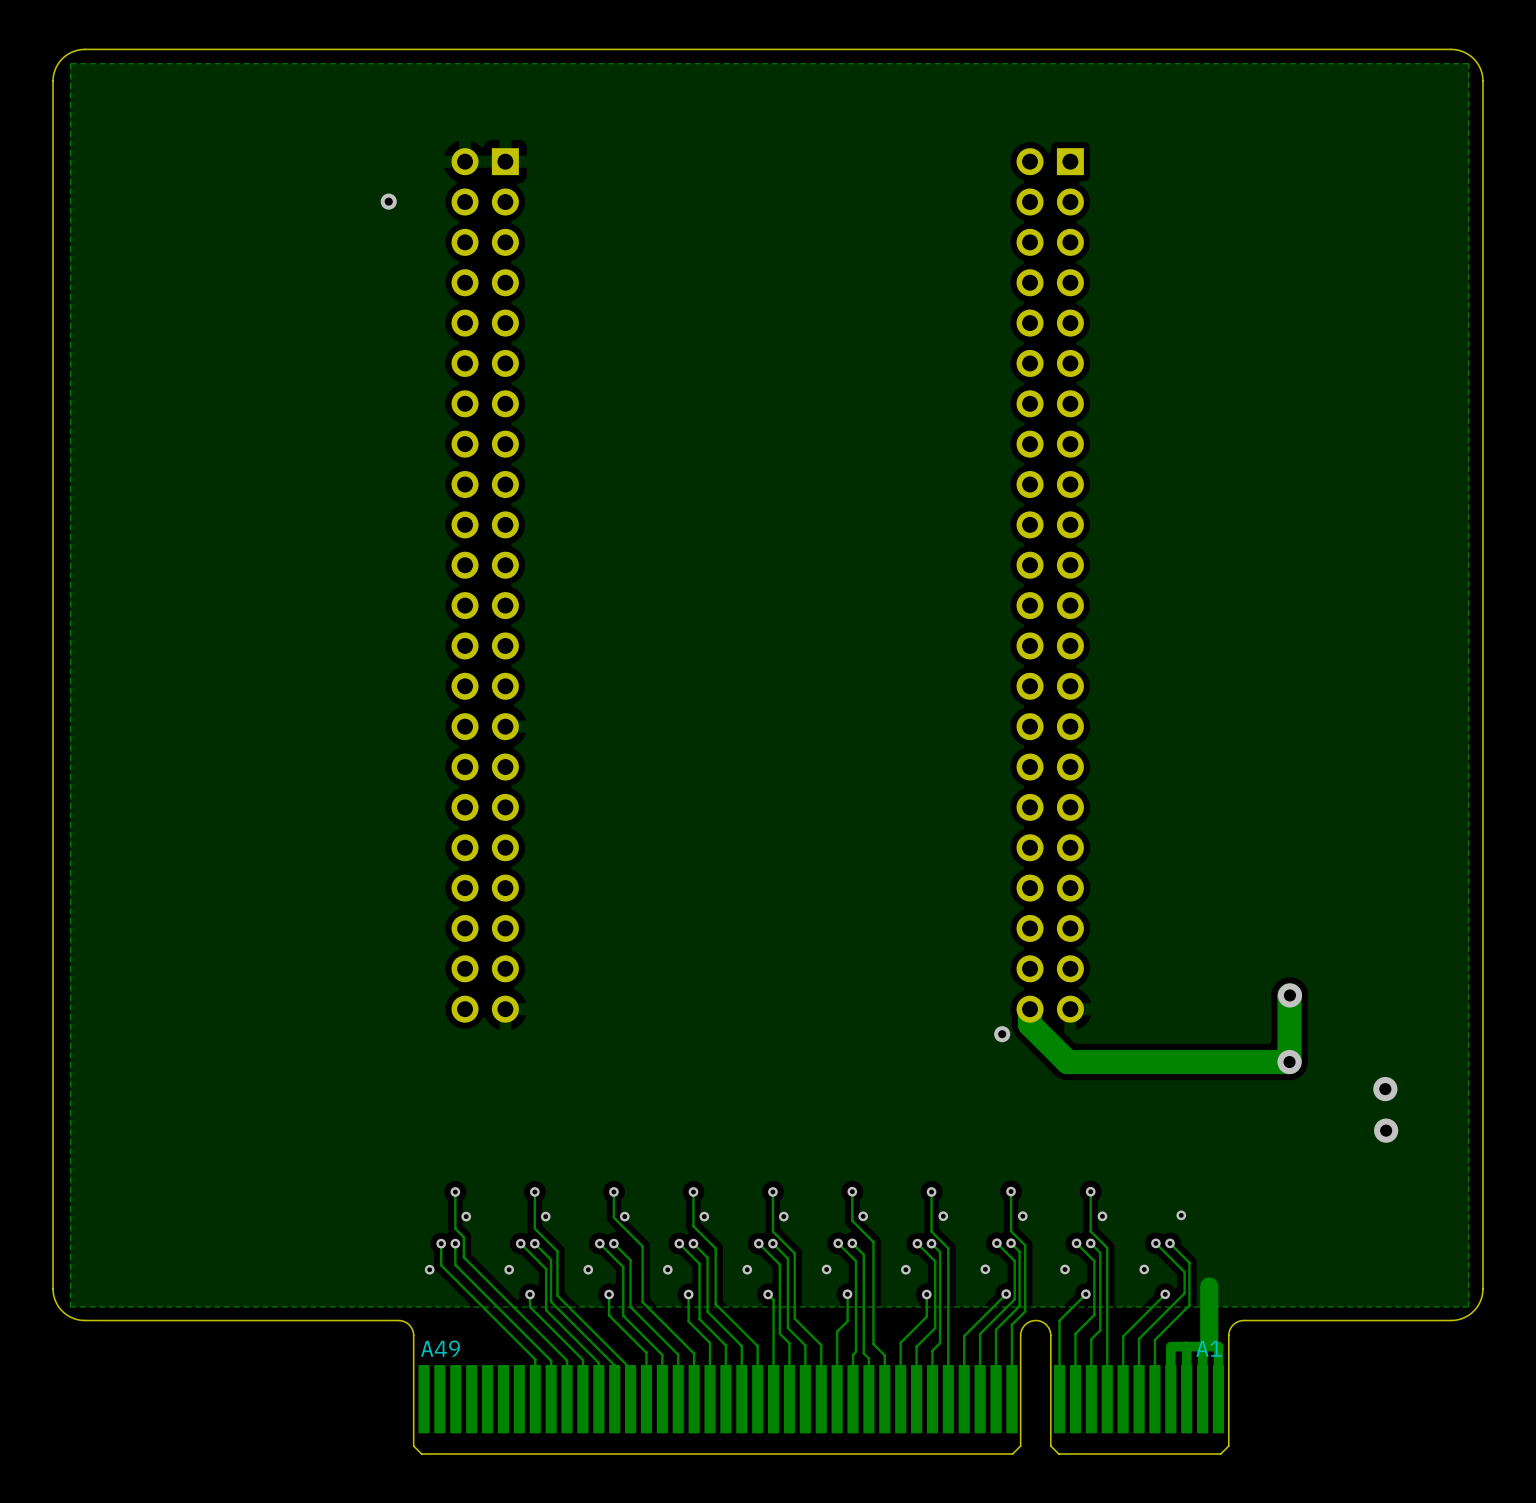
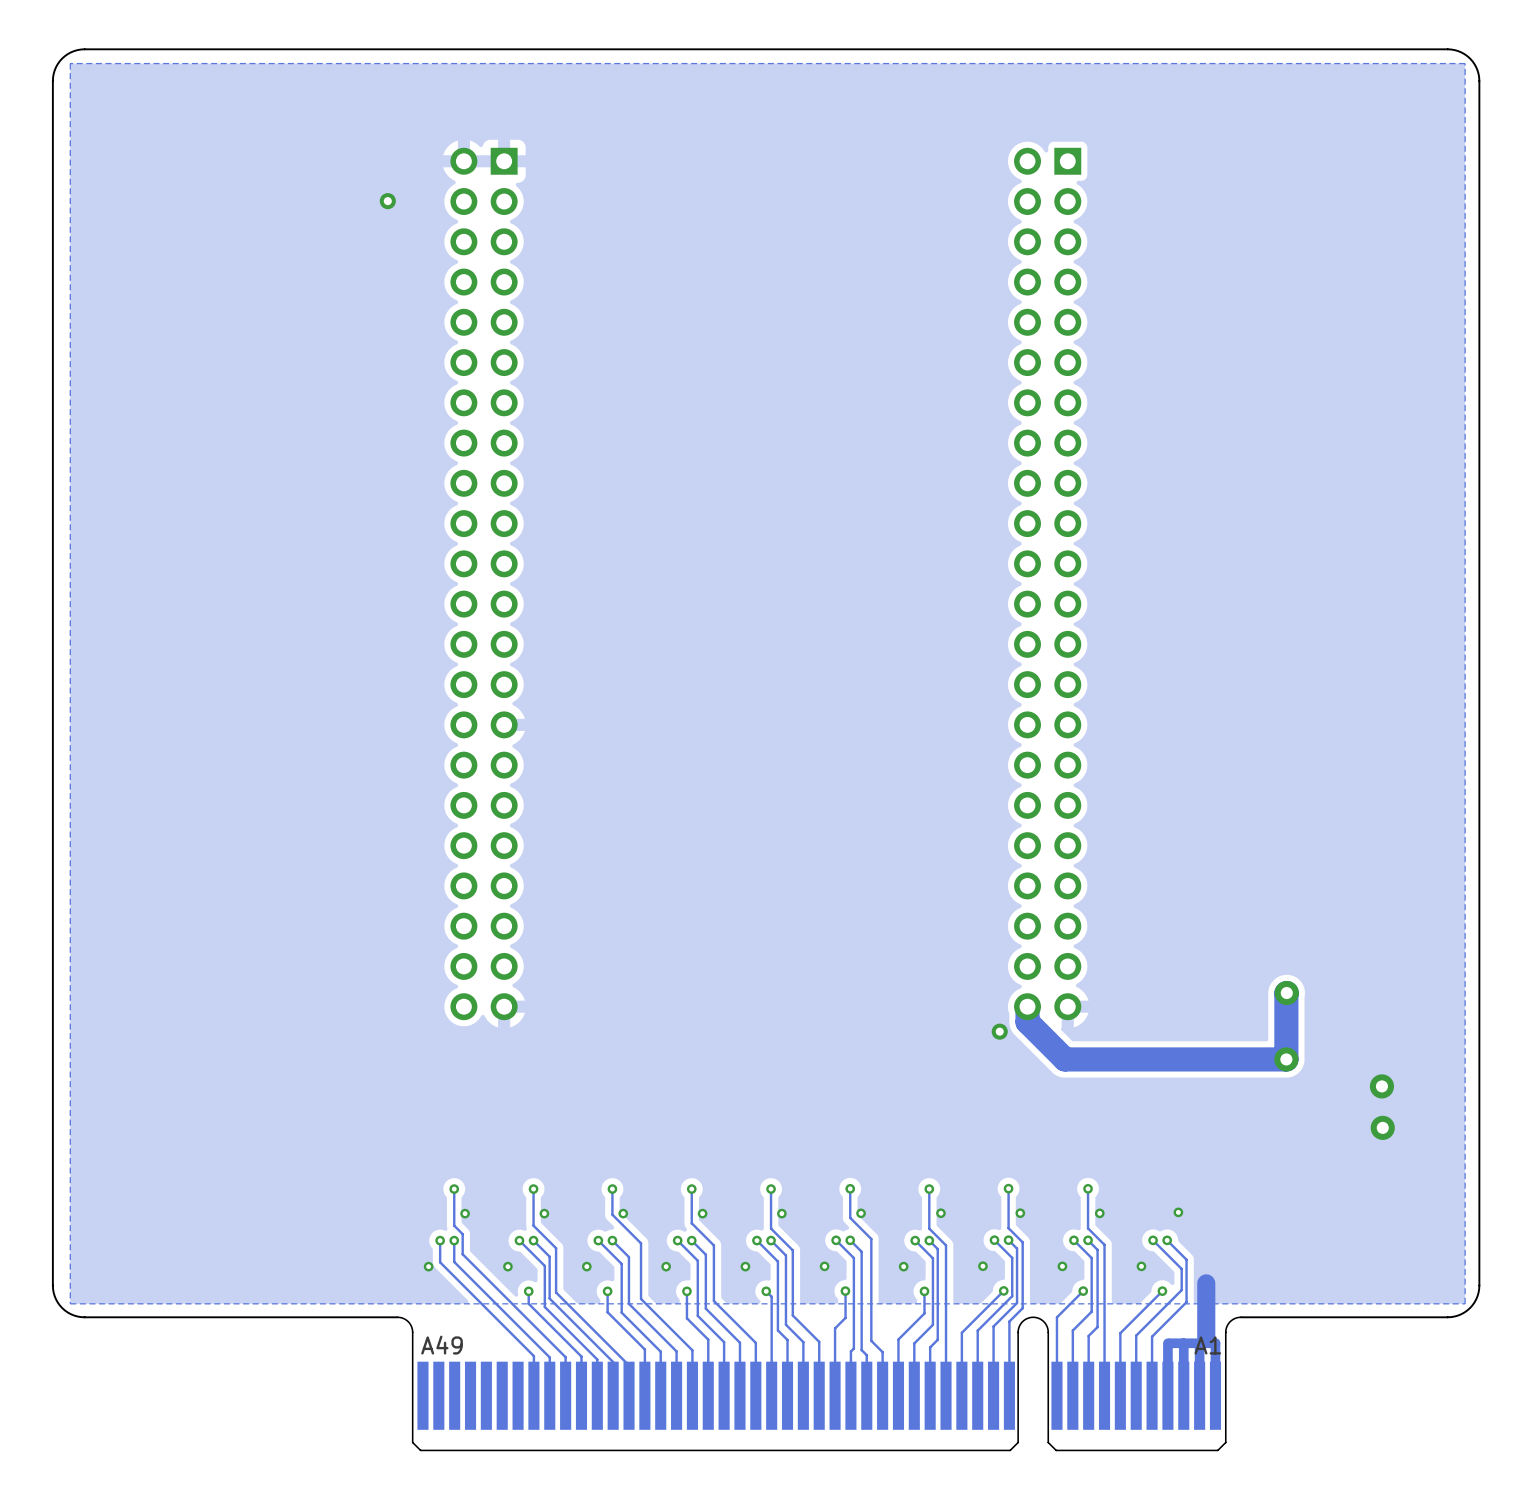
part: none -> (766, 749)
board edge: (1243, 1320) (1454, 1320) (1471, 1313) (1478, 1305) (1482, 1295) (1482, 81) (1481, 70) (1473, 58) (1461, 51) (1451, 49) (77, 50) (67, 54) (59, 61) (54, 70) (53, 81) (53, 1295) (57, 1305) (64, 1313) (81, 1320) (398, 1320) -> none

